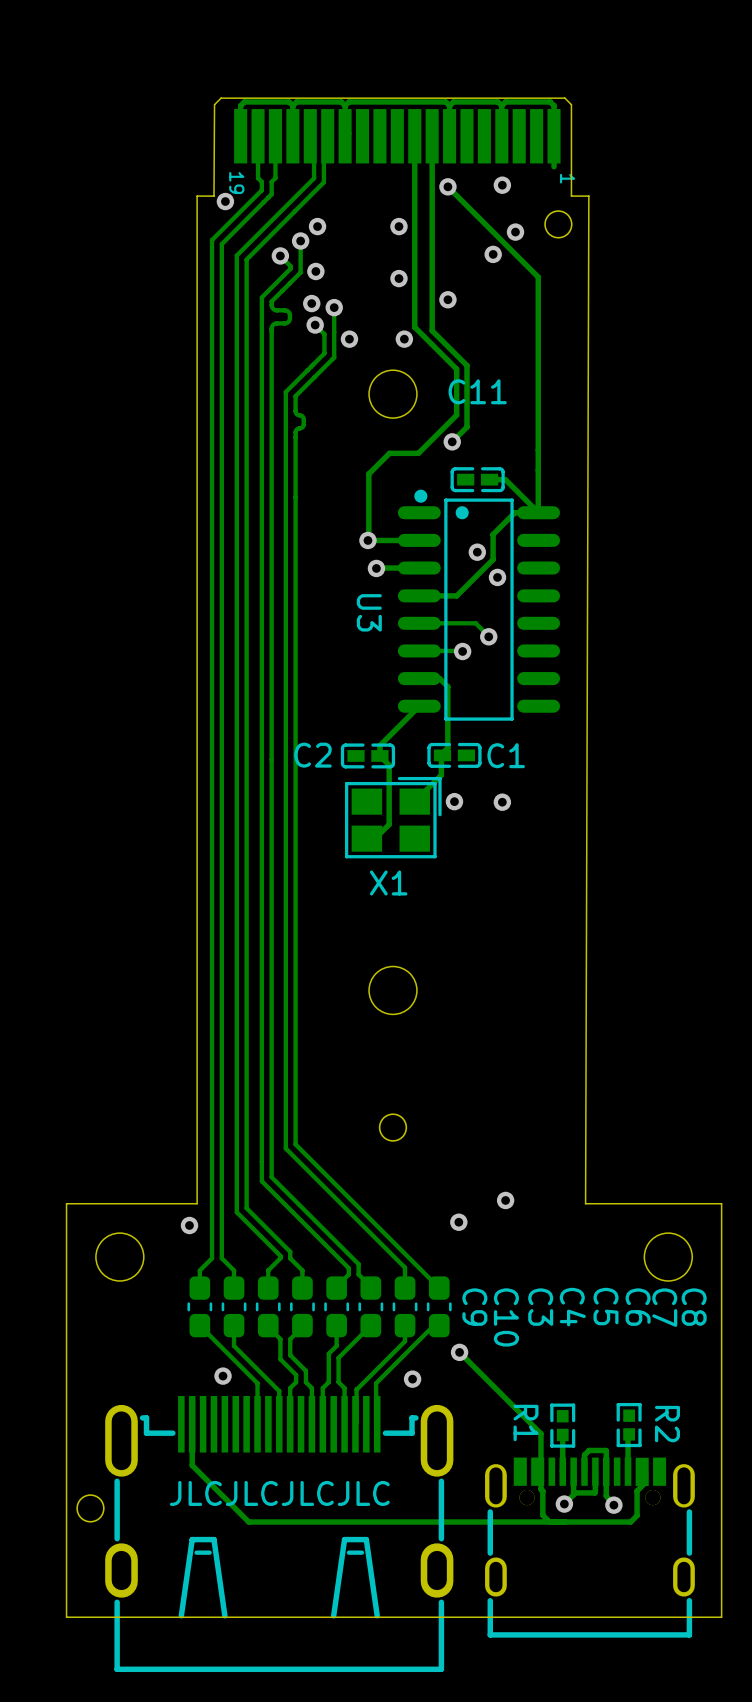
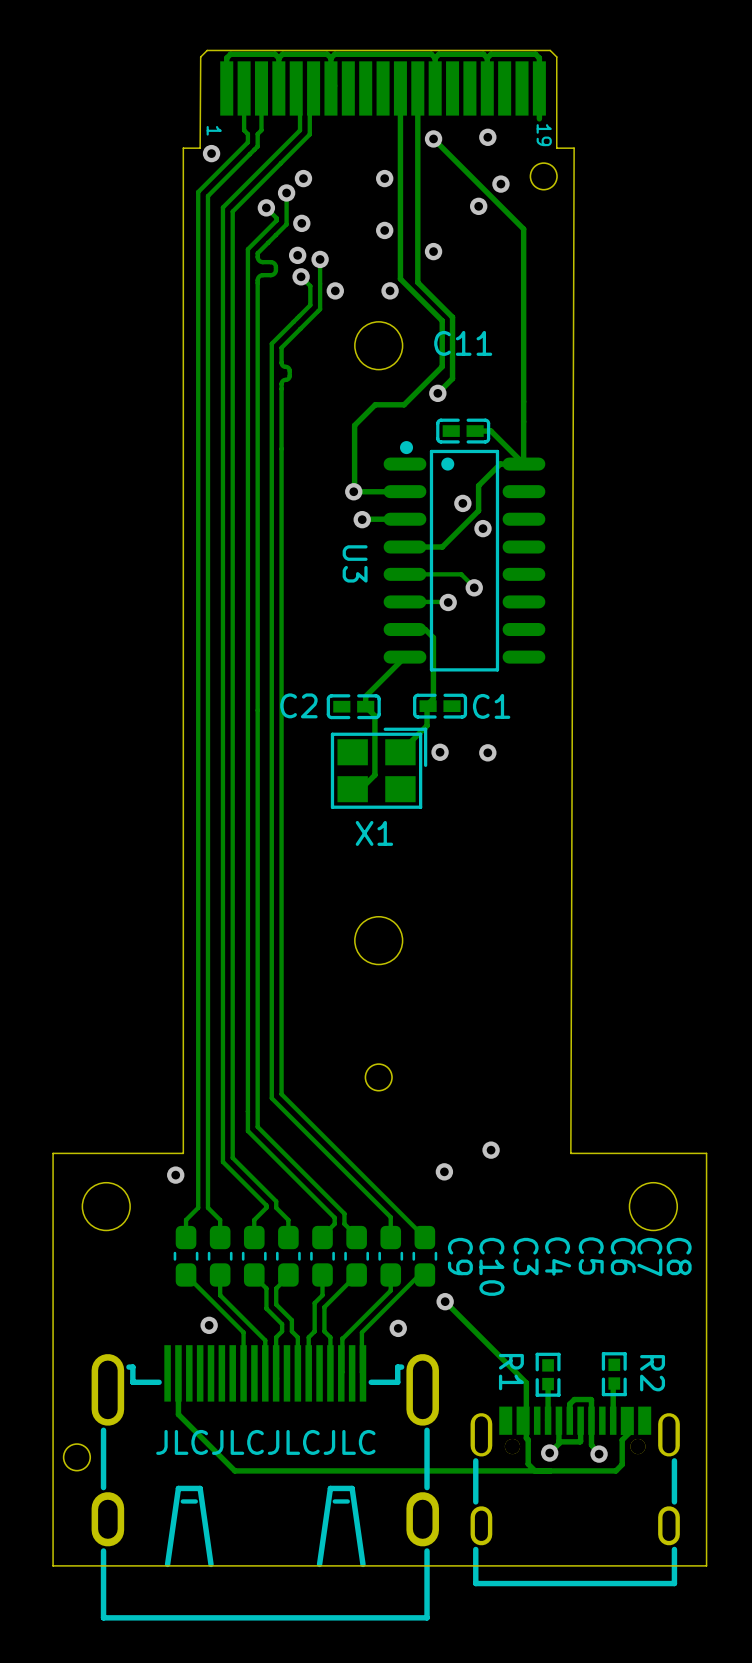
part text position: 1 (567, 178) -> 1 (214, 130)
part text position: 19 (236, 183) -> 19 (544, 135)

